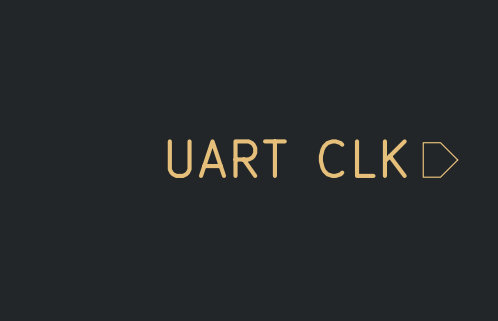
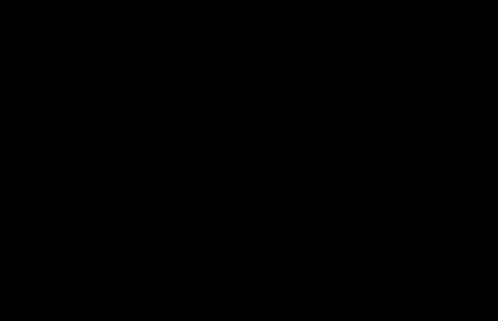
hierarchical label: UART CLK (287, 158) -> none

